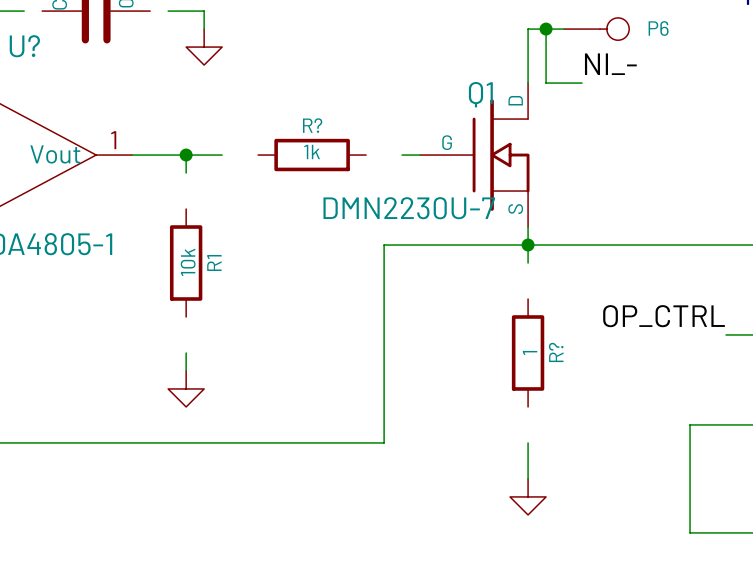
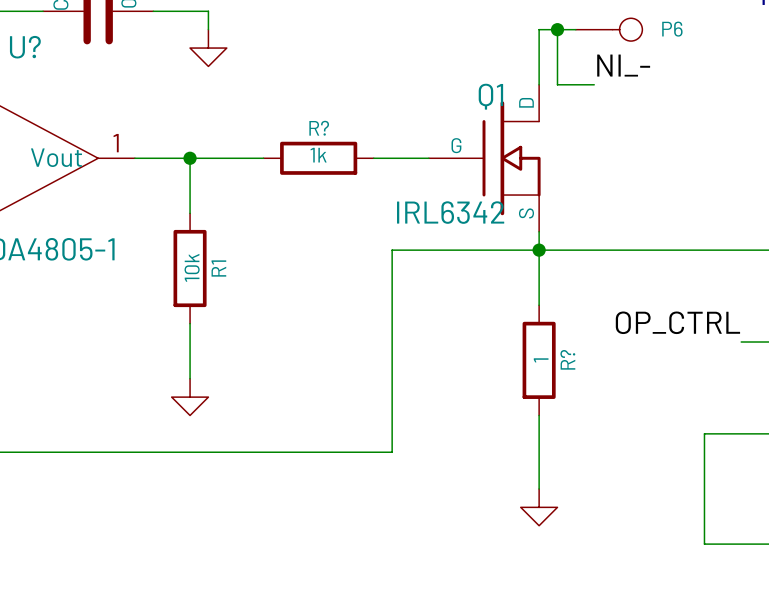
wire: none -> (24, 11) (43, 11)
wire: none -> (153, 11) (171, 11)
wire: none -> (226, 158) (263, 158)
wire: none -> (373, 158) (410, 158)
wire: none -> (190, 176) (190, 213)
Q1 value: DMN2230U-7 (409, 208) -> IRL6342 (450, 212)
wire: none -> (539, 268) (539, 305)
wire: none -> (190, 323) (190, 360)
wire: none -> (539, 415) (539, 452)

